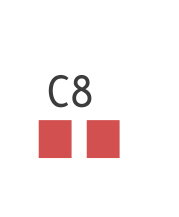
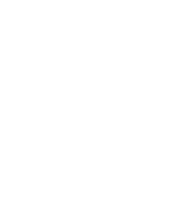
C8: (79, 139) -> none

